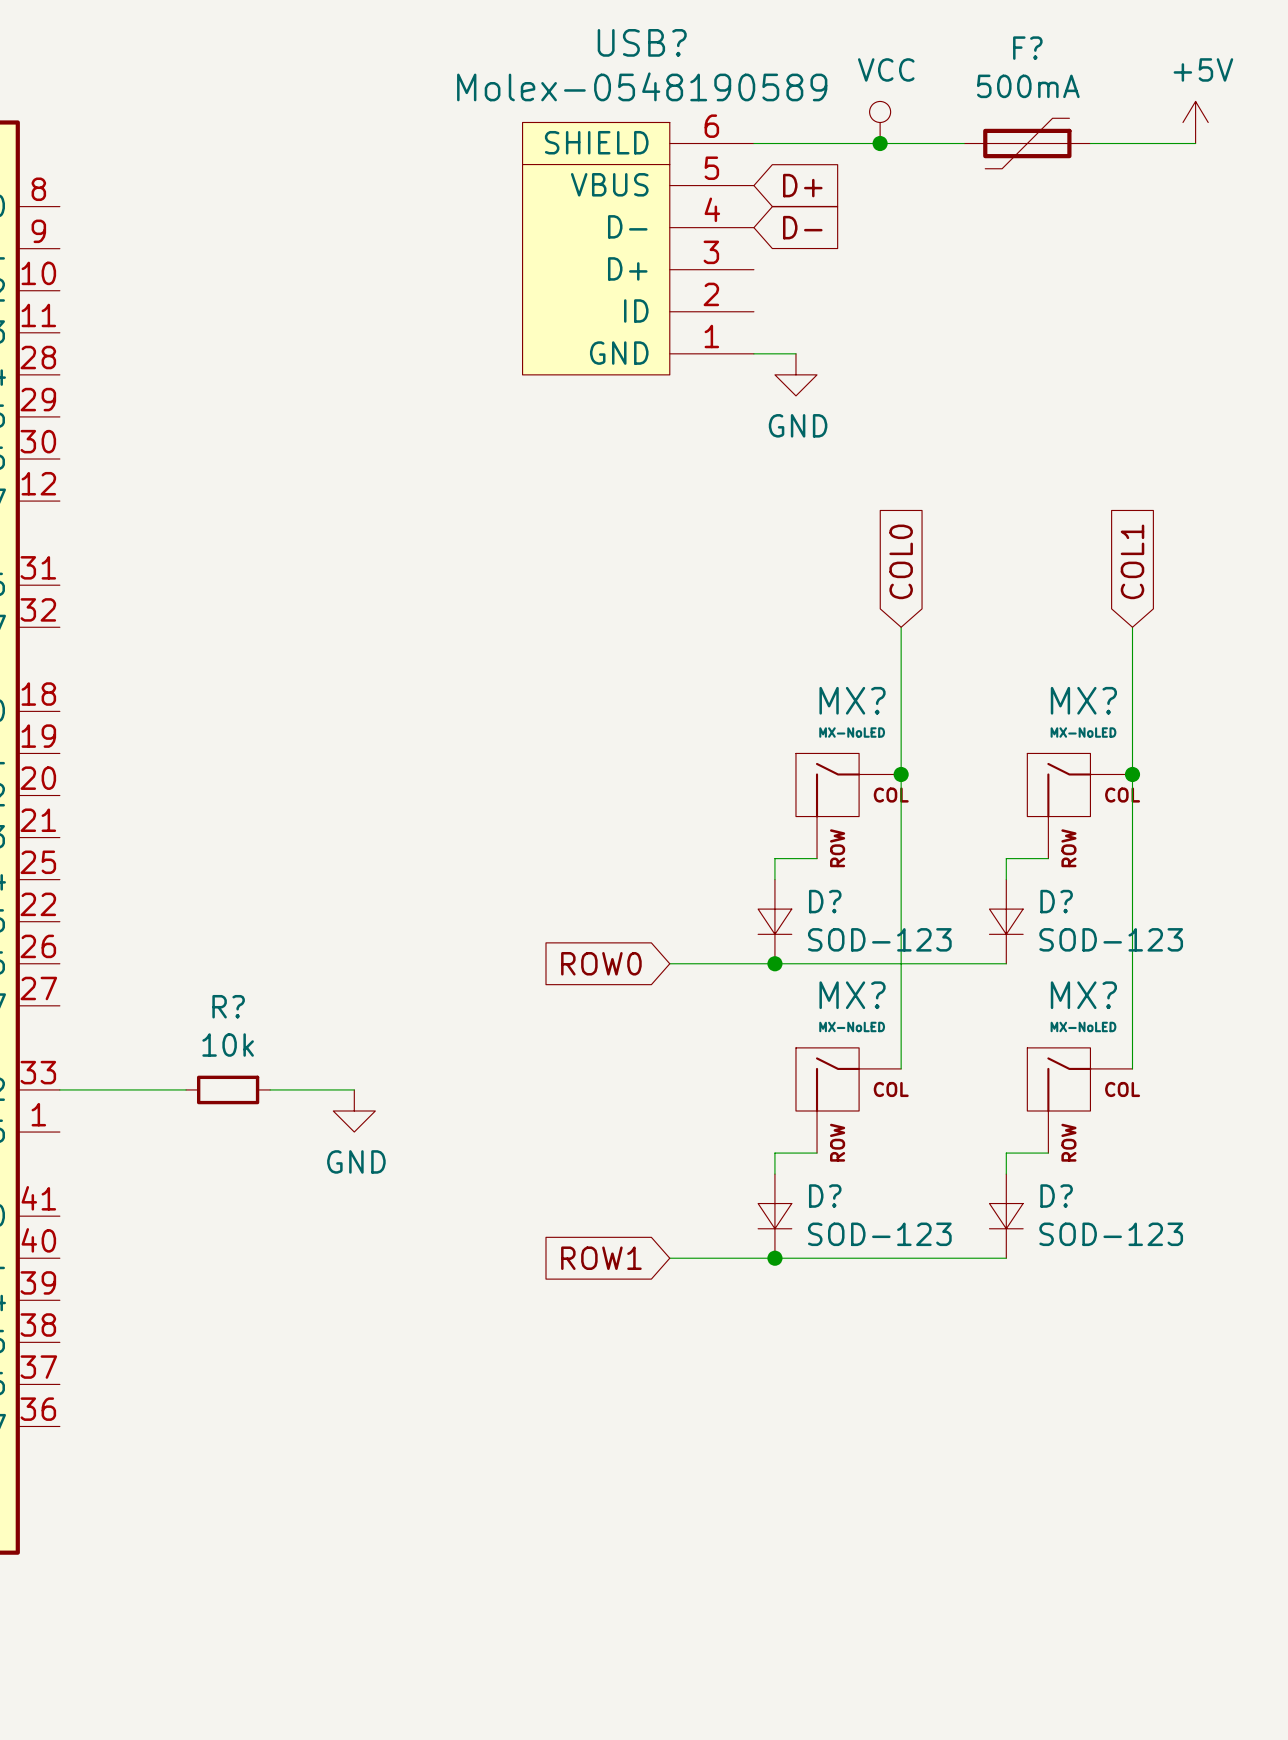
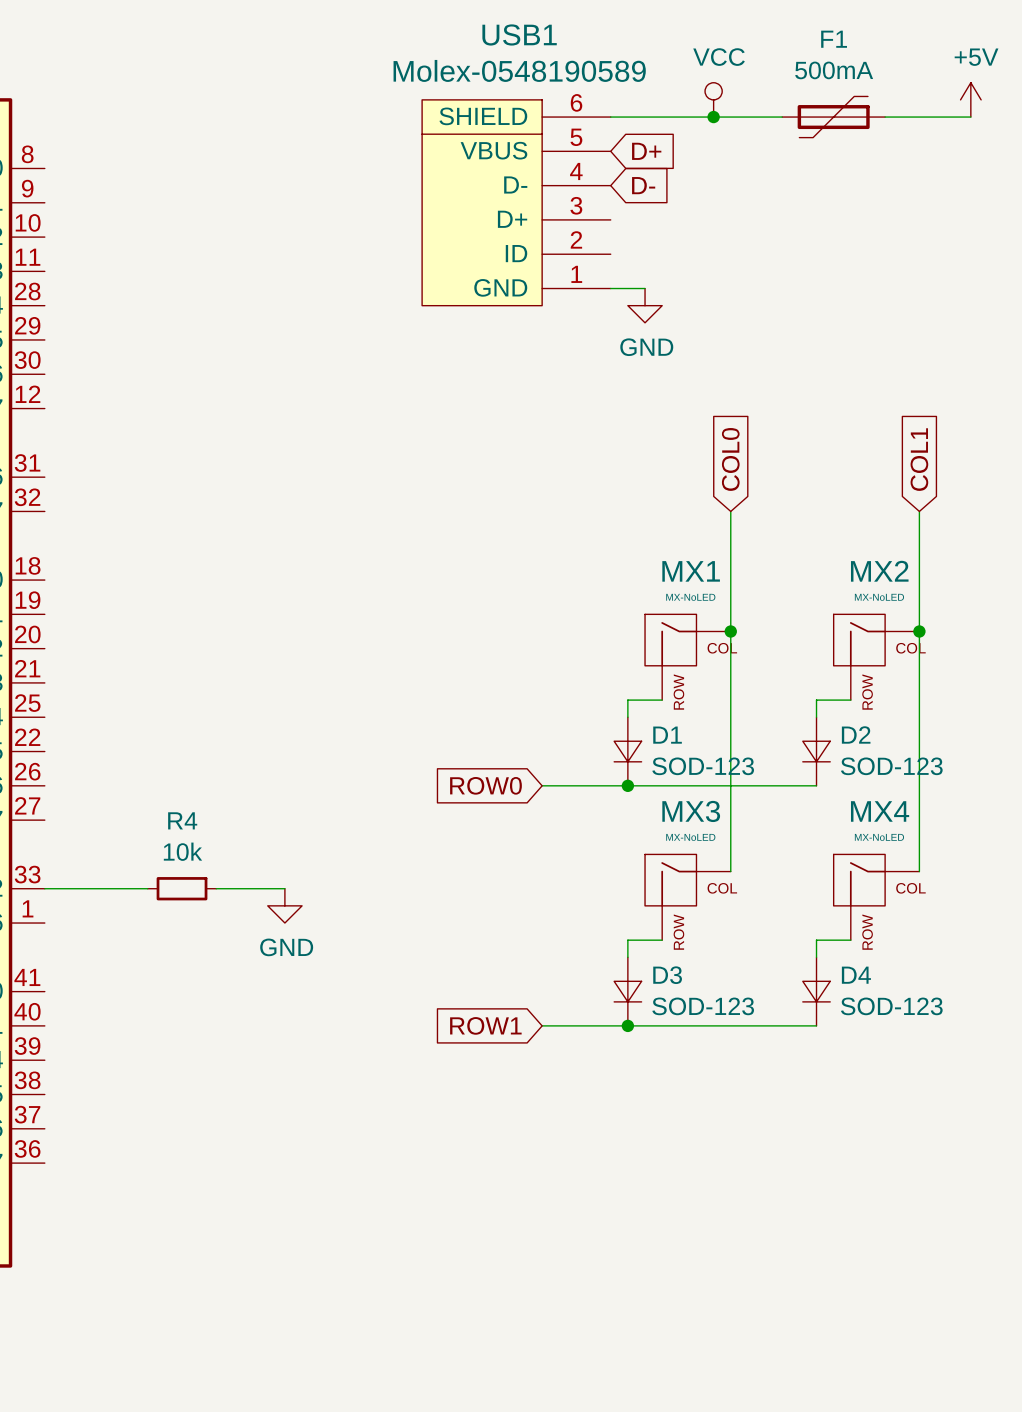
USB? name: USB? (642, 42) -> USB1 (519, 34)
F? name: F? (1027, 48) -> F1 (834, 39)
MX? name: MX? (852, 700) -> MX1 (691, 571)
MX? name: MX? (1083, 700) -> MX2 (879, 571)
D? name: D? (825, 901) -> D1 (667, 735)
D? name: D? (1056, 901) -> D2 (856, 734)
MX? name: MX? (852, 995) -> MX3 (691, 811)
MX? name: MX? (1083, 995) -> MX4 (880, 811)
R? name: R? (228, 1006) -> R4 (182, 820)
D? name: D? (825, 1196) -> D3 (667, 975)
D? name: D? (1056, 1196) -> D4 (856, 975)

